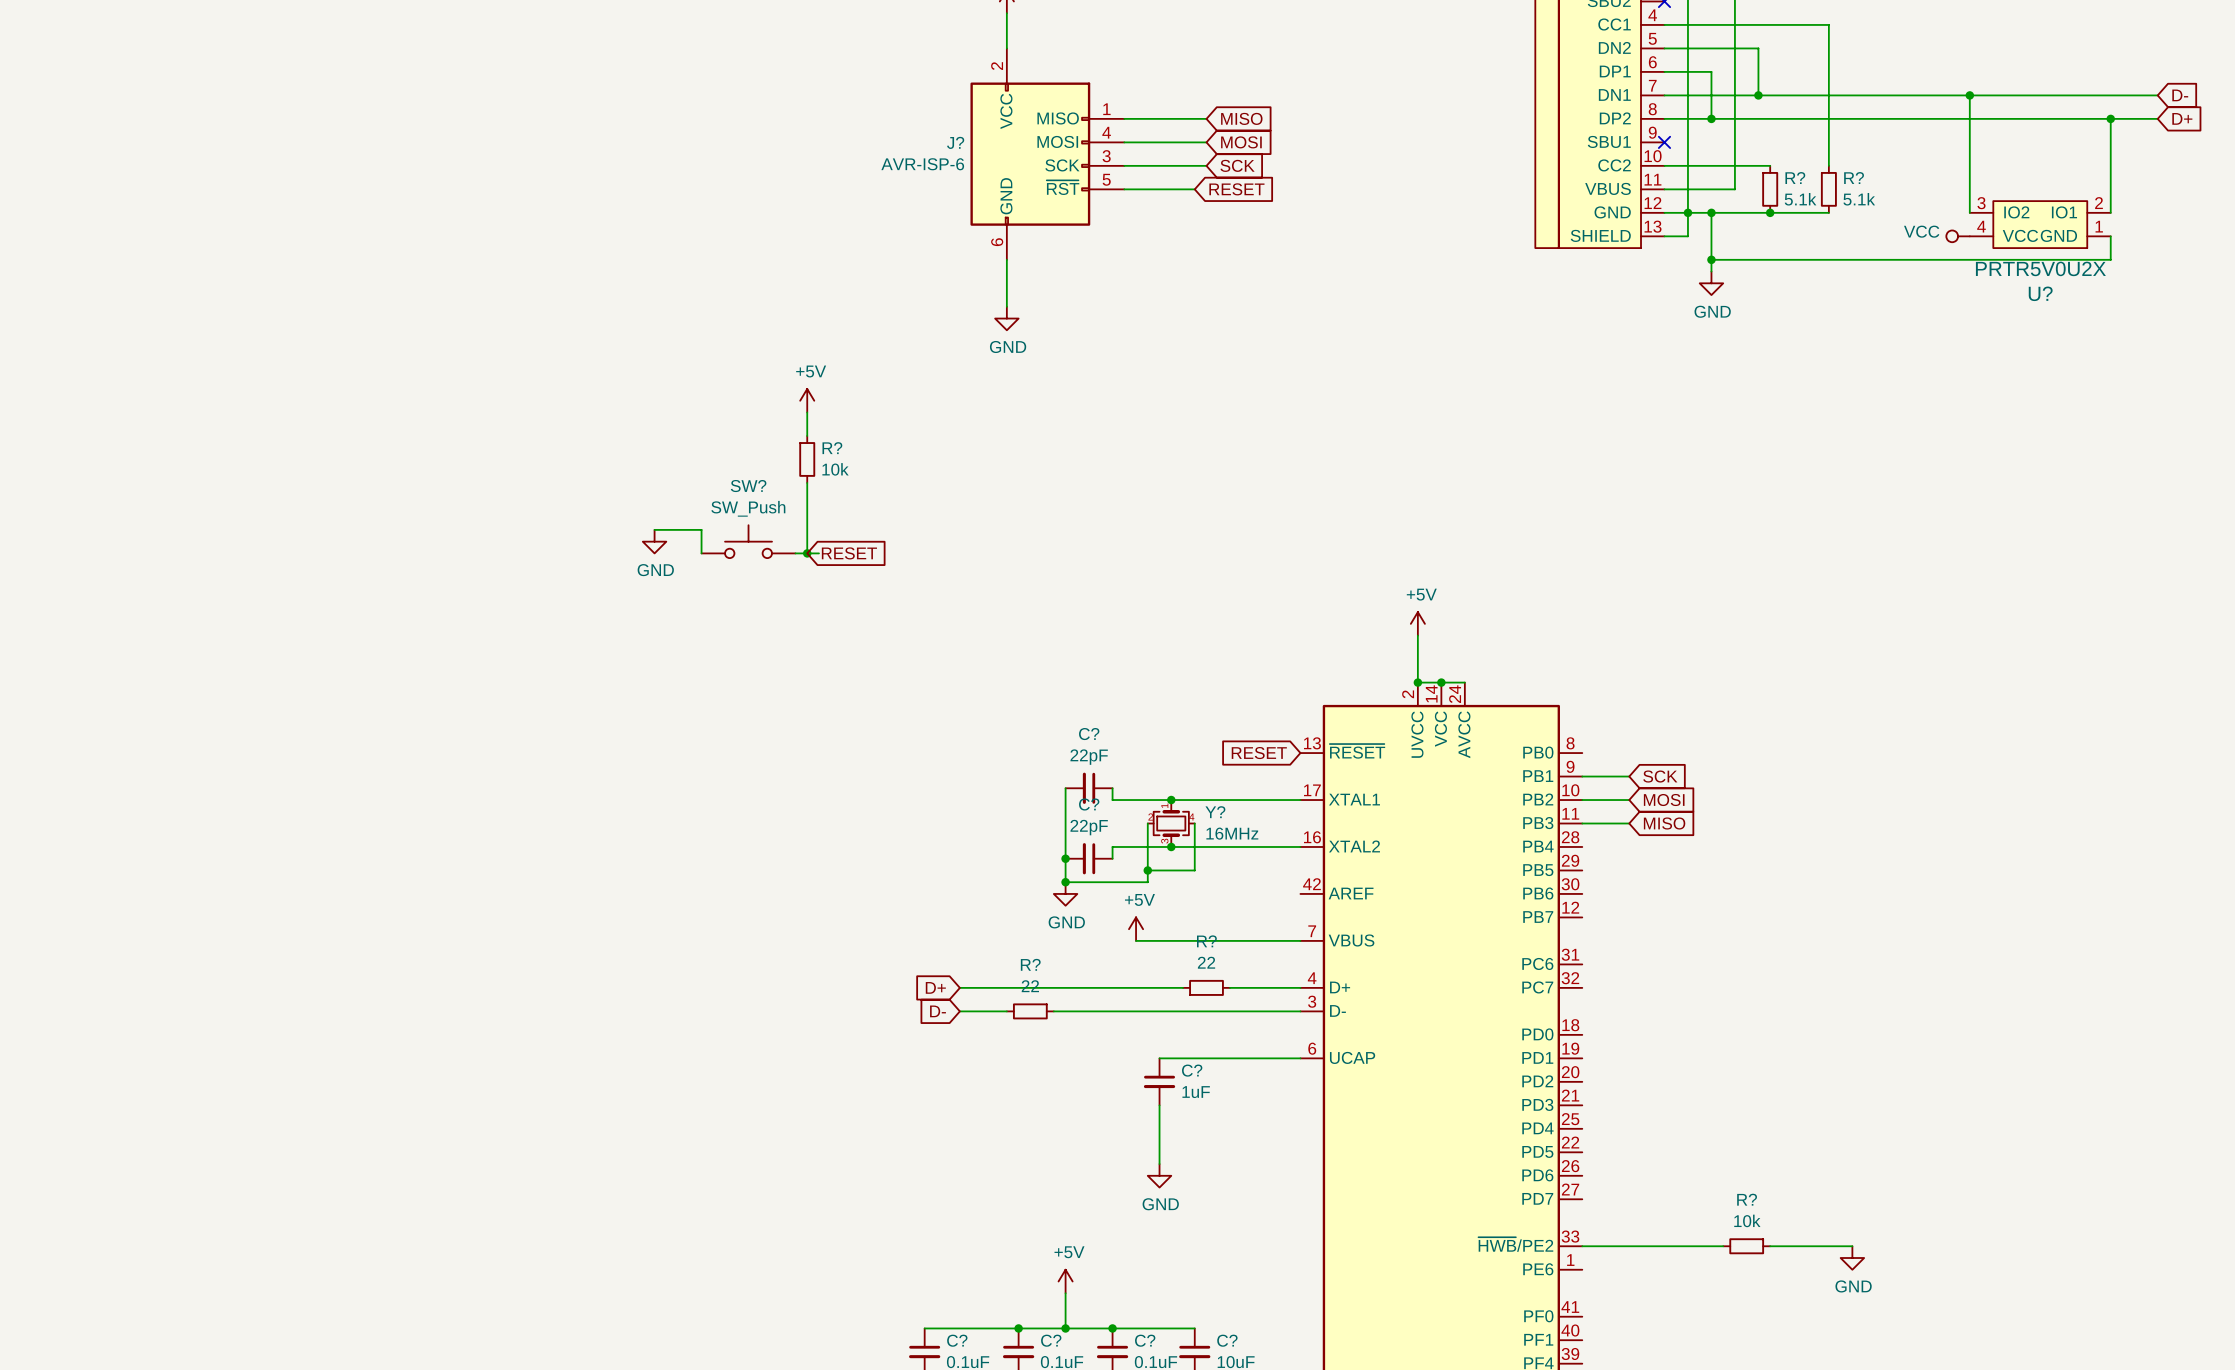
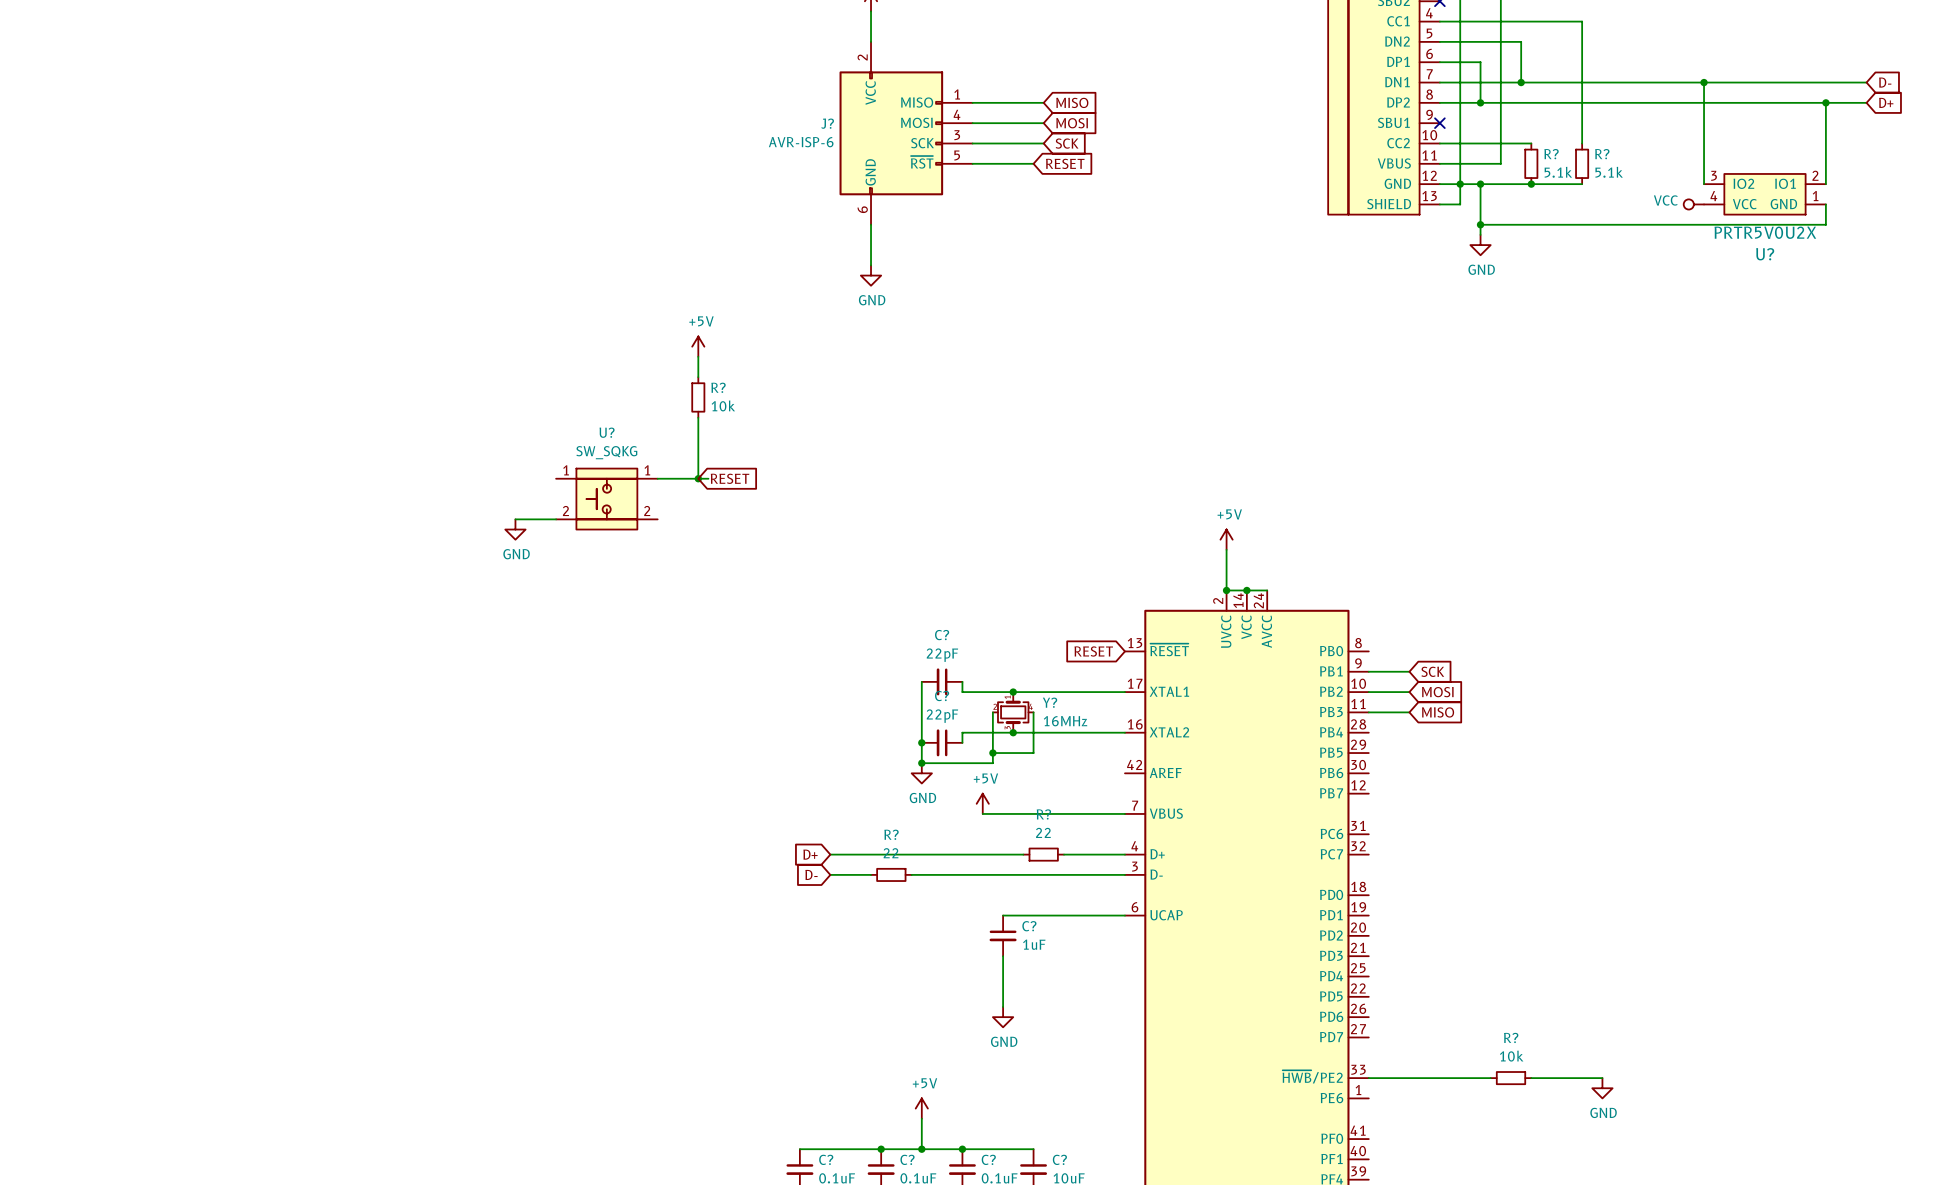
wire: (654, 529) (701, 529) (701, 553) -> none
power symbol position: GND (654, 541) -> GND (515, 529)
SW?: SW_Push (748, 541) -> none
U?: none -> SW_SQKG (606, 499)
wire: none -> (515, 519) (556, 519)

